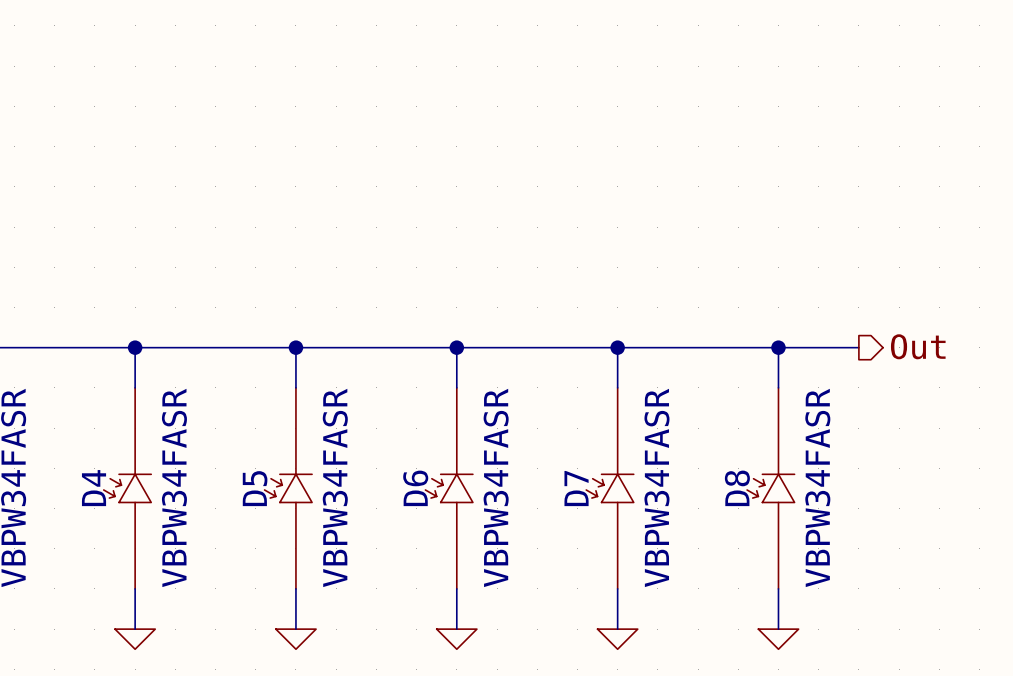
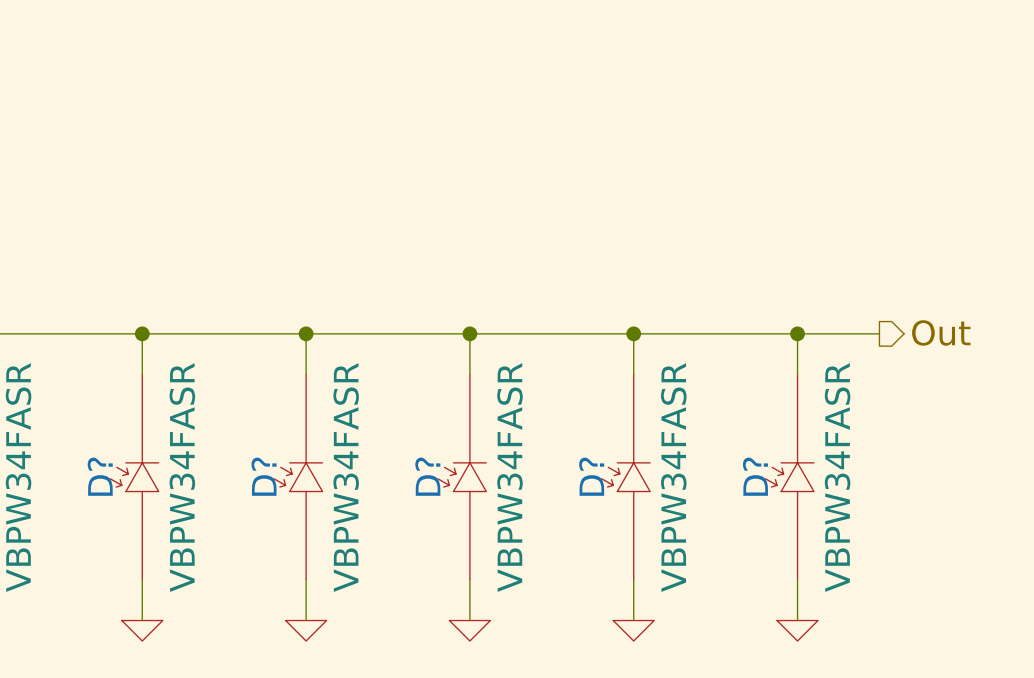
D4 name: D4 (94, 488) -> D? (100, 476)
D5 name: D5 (255, 488) -> D? (264, 476)
D6 name: D6 (415, 488) -> D? (427, 476)
D7 name: D7 (576, 488) -> D? (591, 476)
D8 name: D8 (737, 488) -> D? (755, 476)

